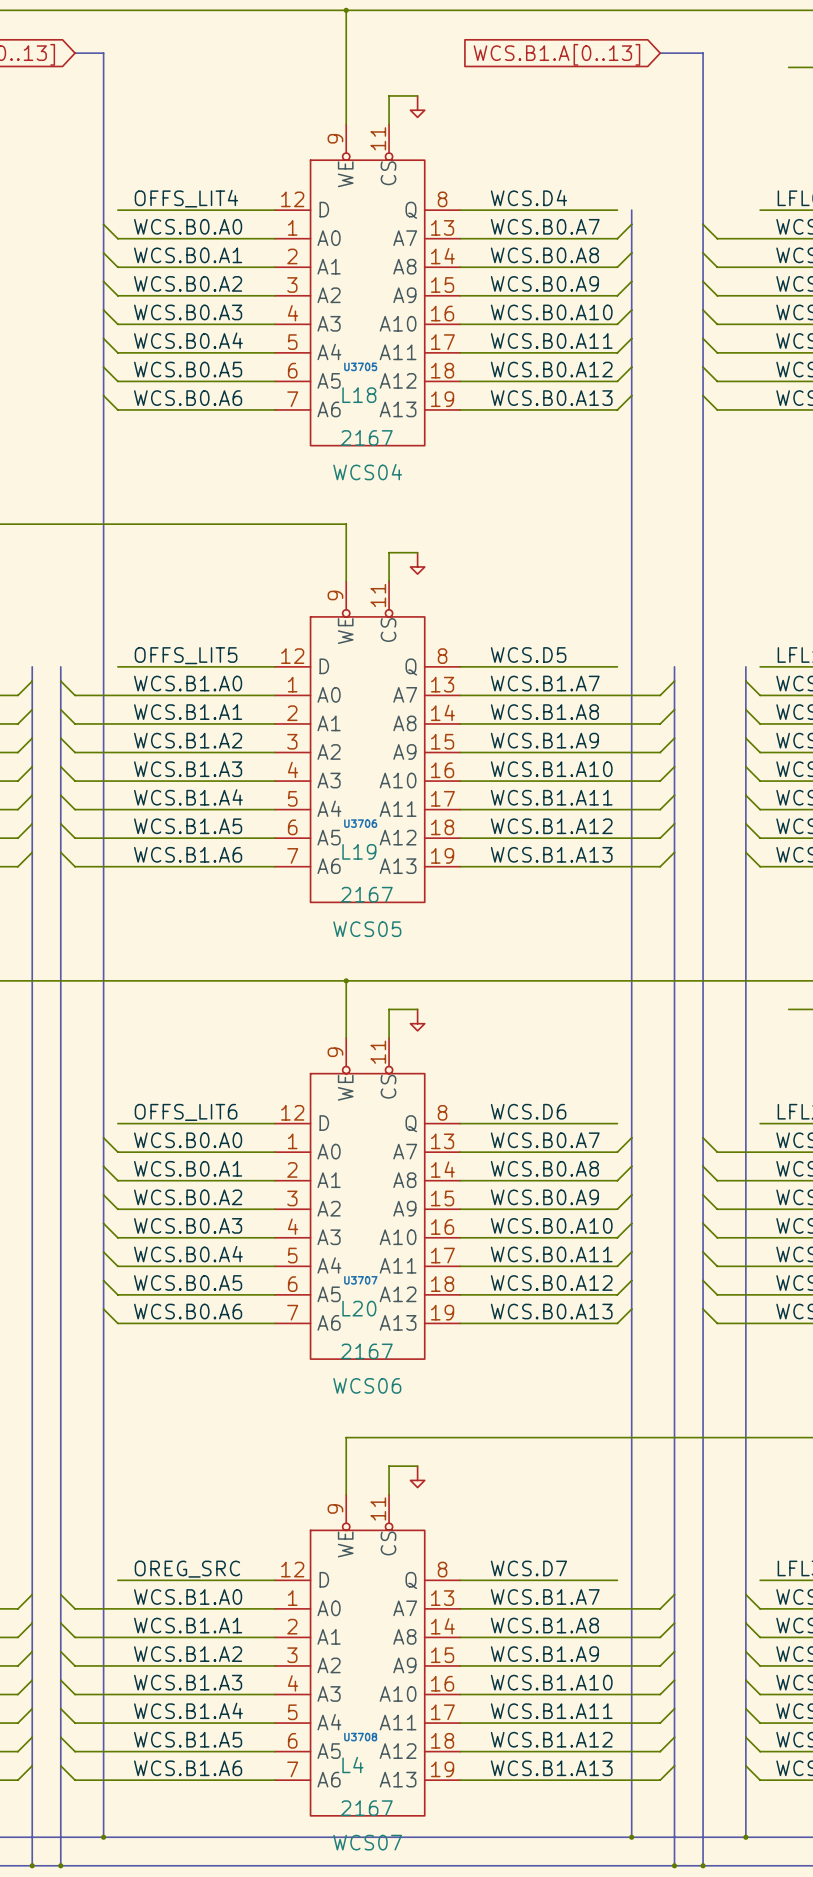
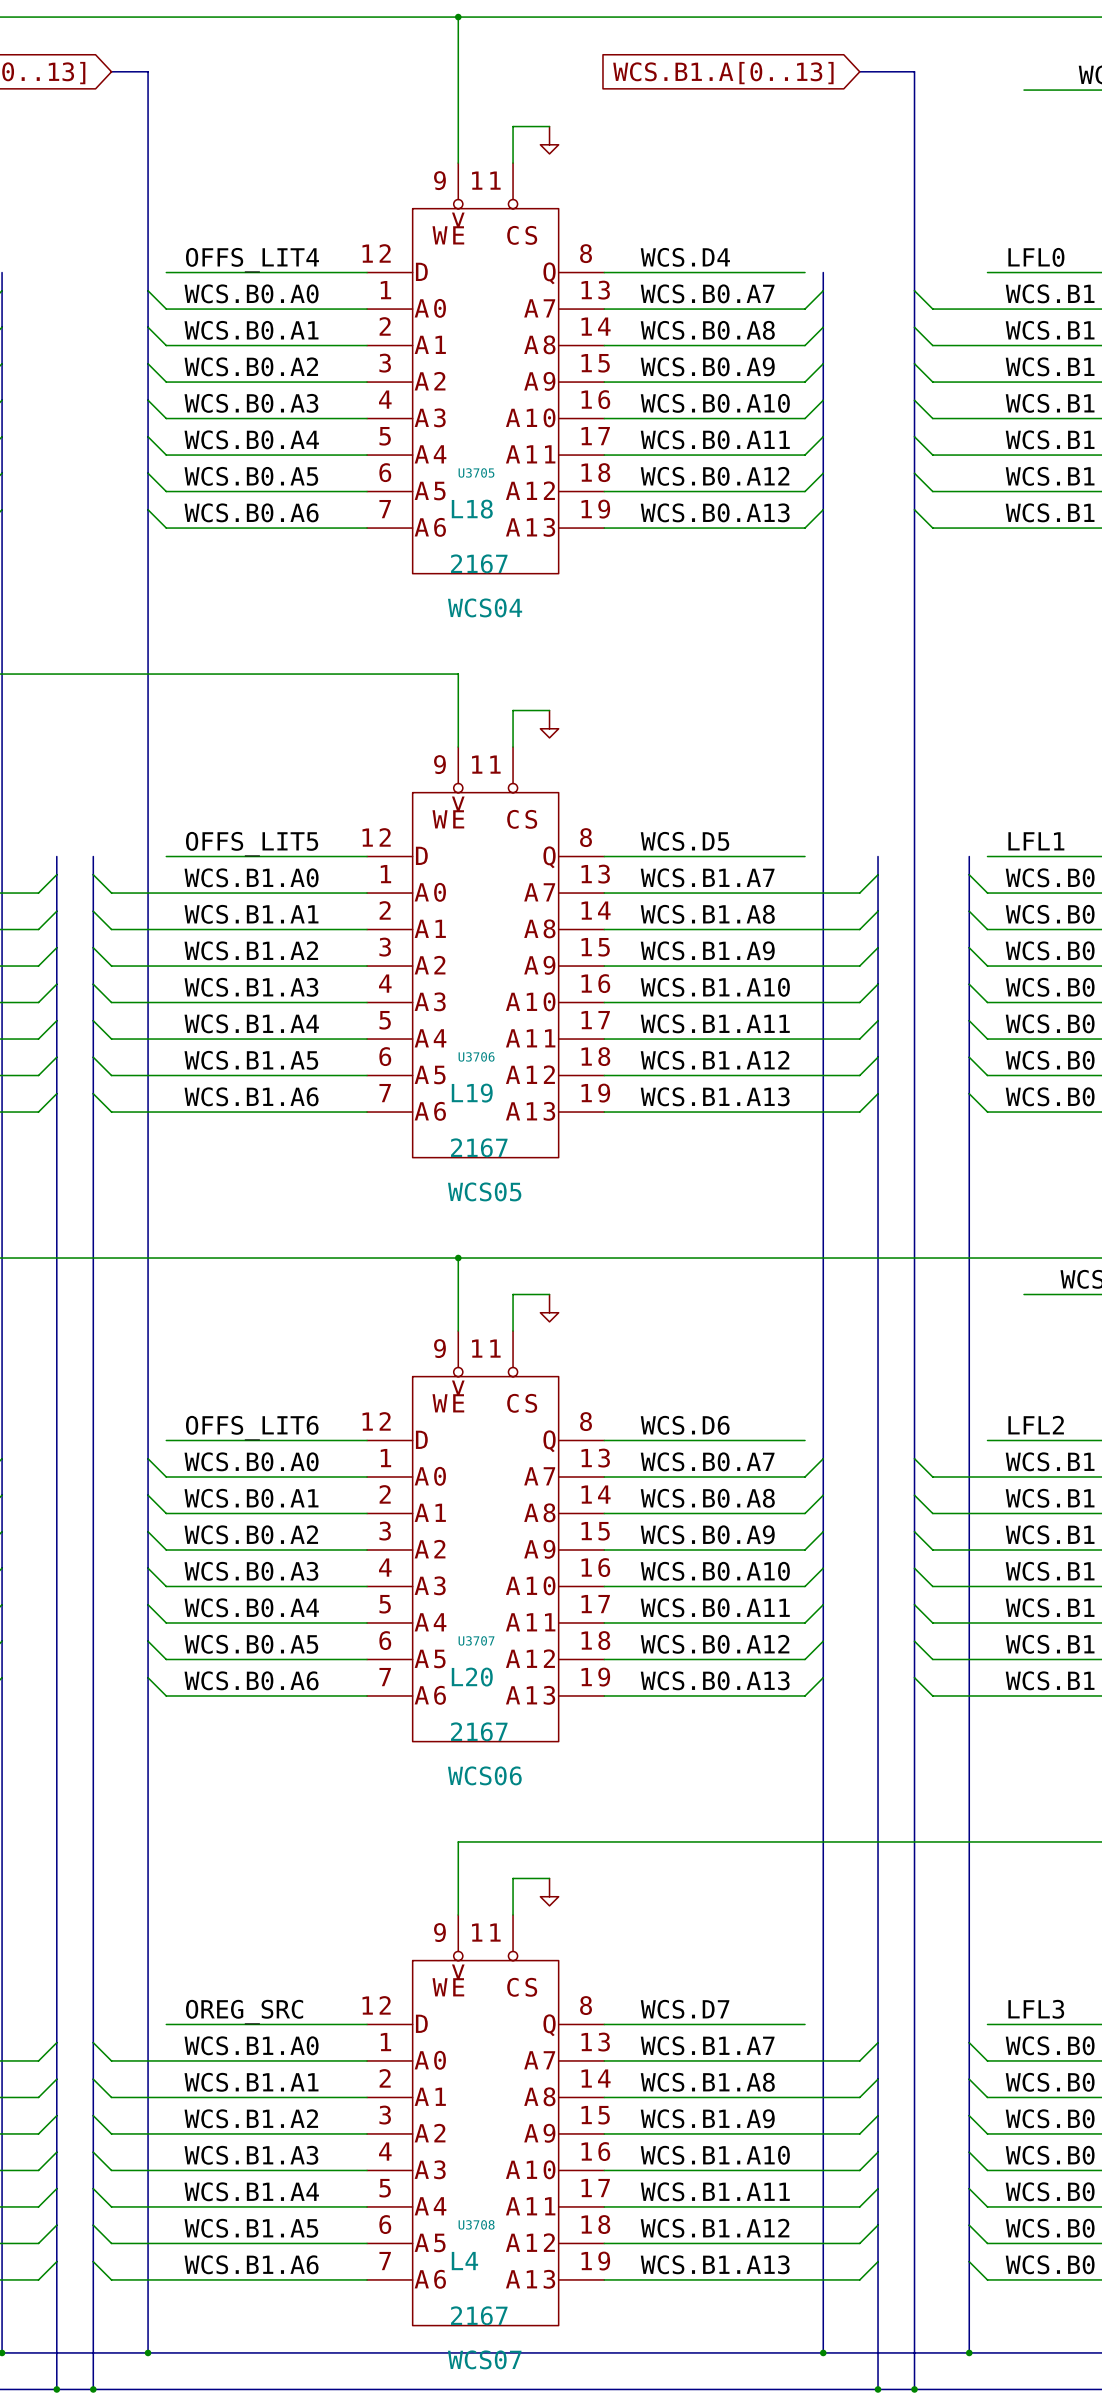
U3705 symbol: [274, 124, 461, 446] -> [367, 163, 605, 574]
U3706 symbol: [274, 581, 461, 903] -> [367, 747, 605, 1158]
U3707 symbol: [274, 1037, 461, 1360] -> [367, 1331, 605, 1742]
U3708 symbol: [274, 1494, 461, 1816] -> [367, 1914, 605, 2326]

